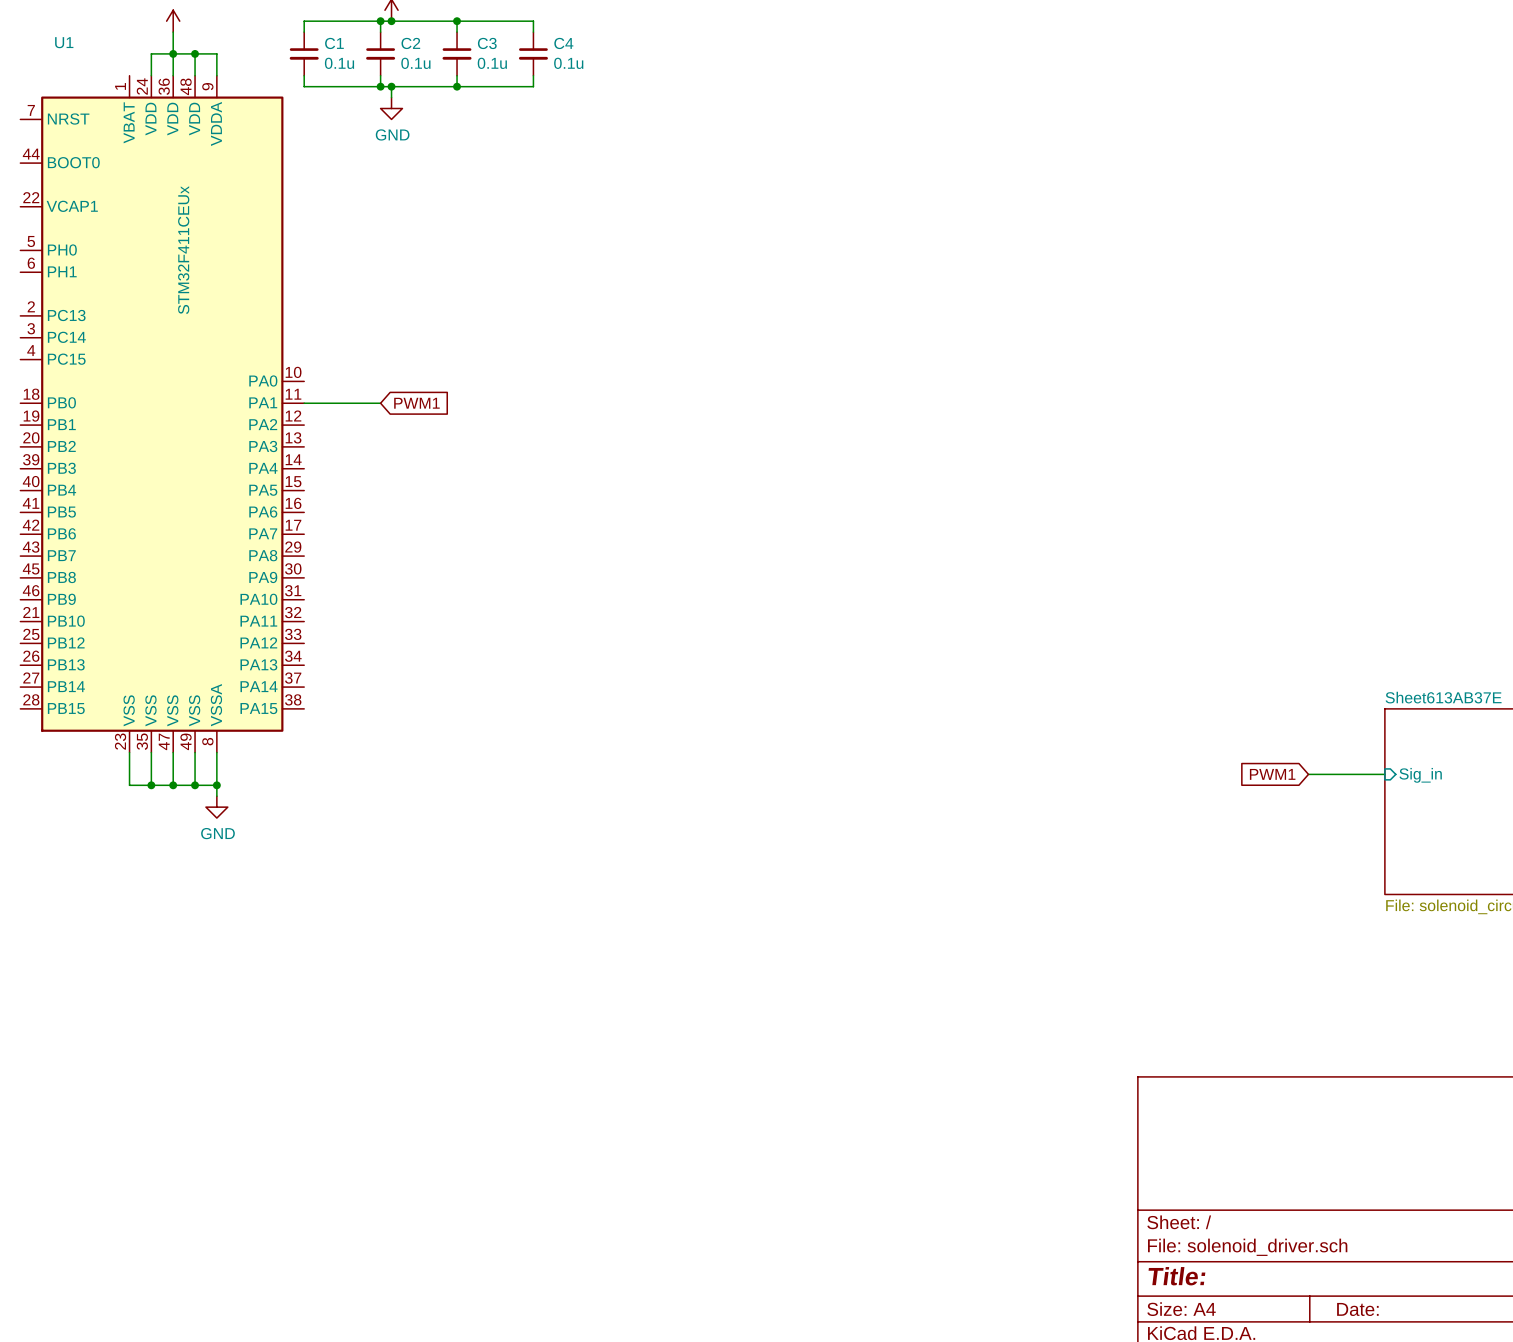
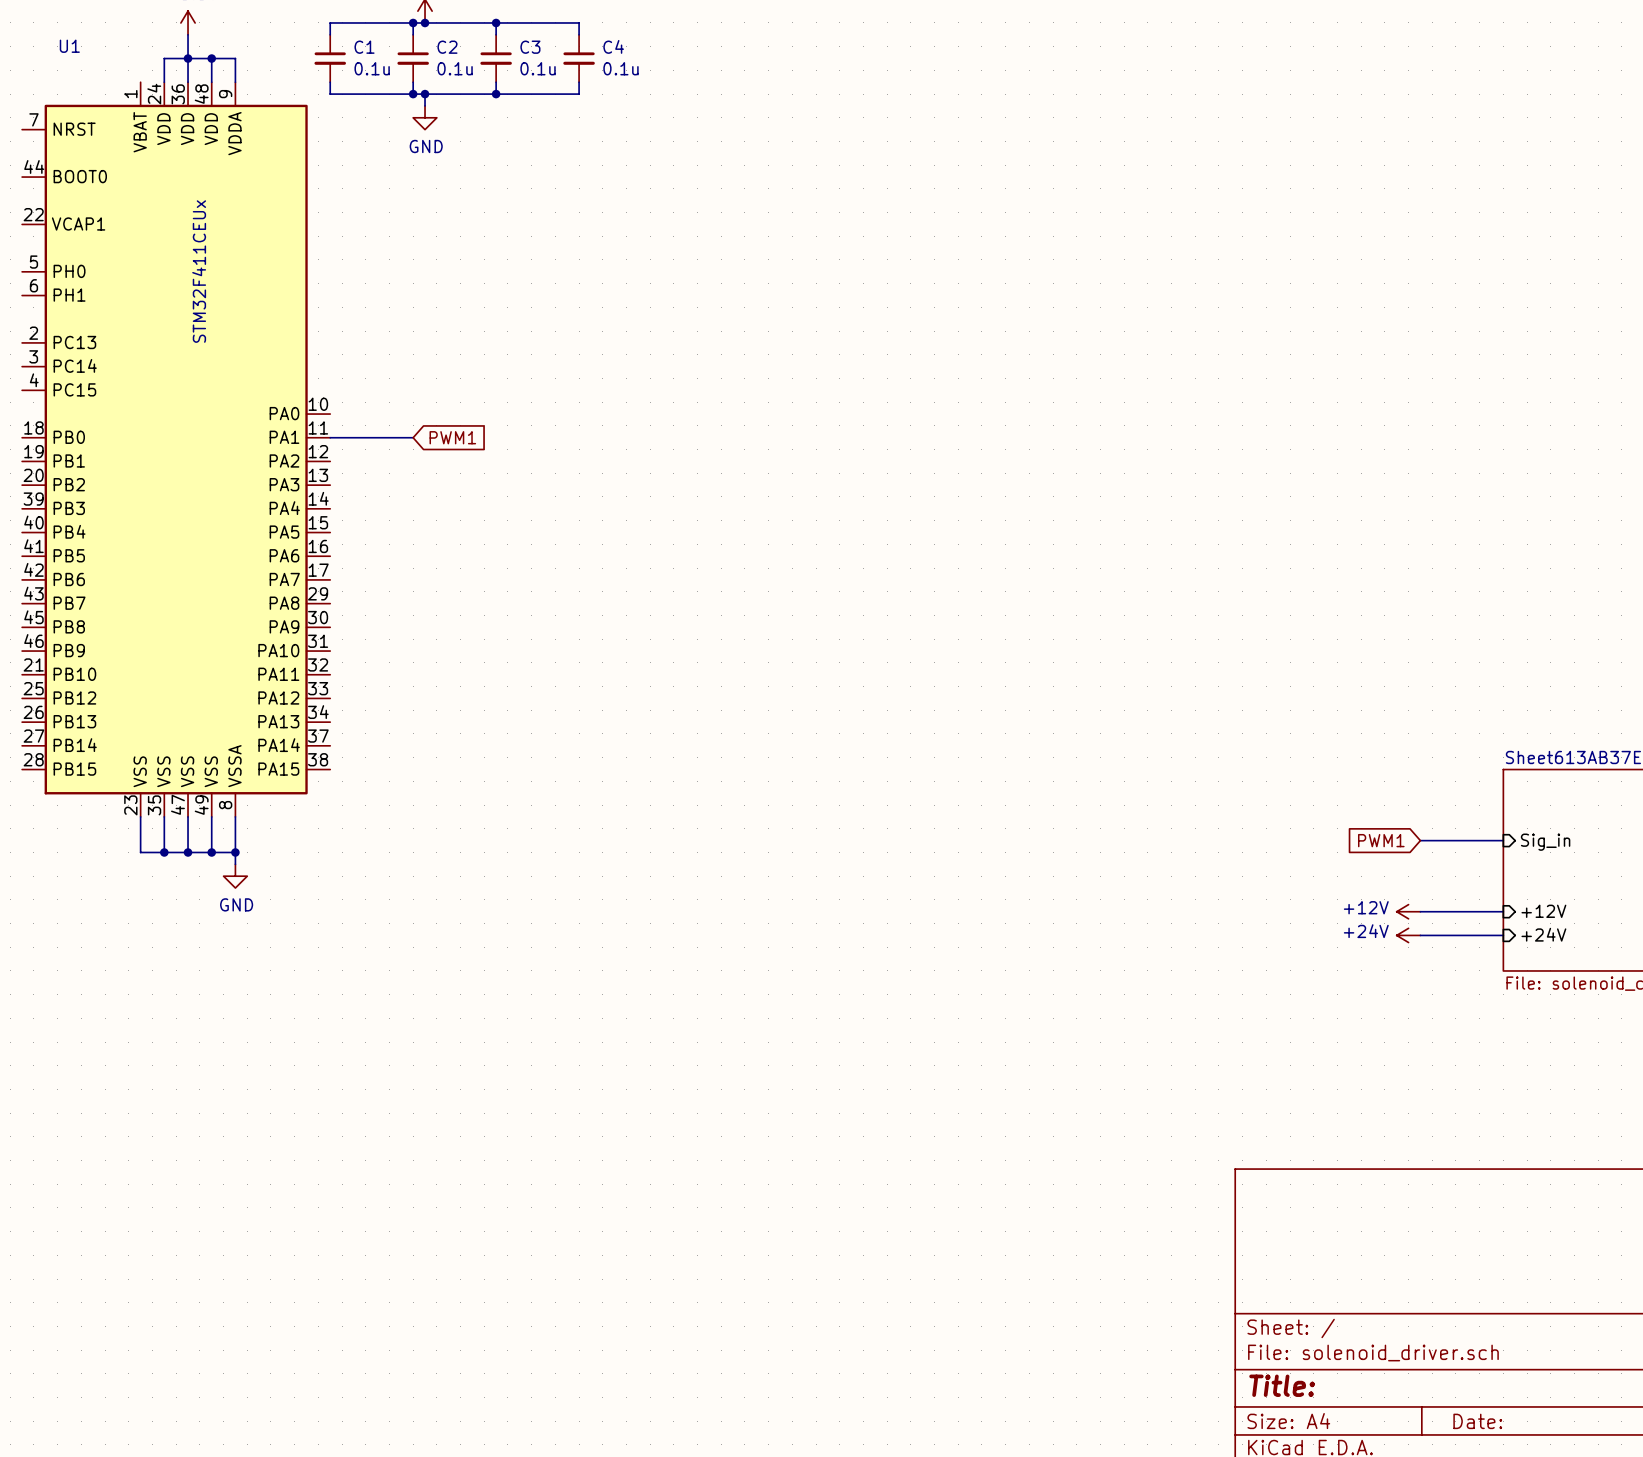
power symbol: none -> +12V (1408, 911)
wire: none -> (1420, 911) (1503, 911)
sheet pin: none -> +12V (1543, 911)
power symbol: none -> +24V (1408, 935)
wire: none -> (1420, 935) (1503, 935)
sheet pin: none -> +24V (1543, 934)

